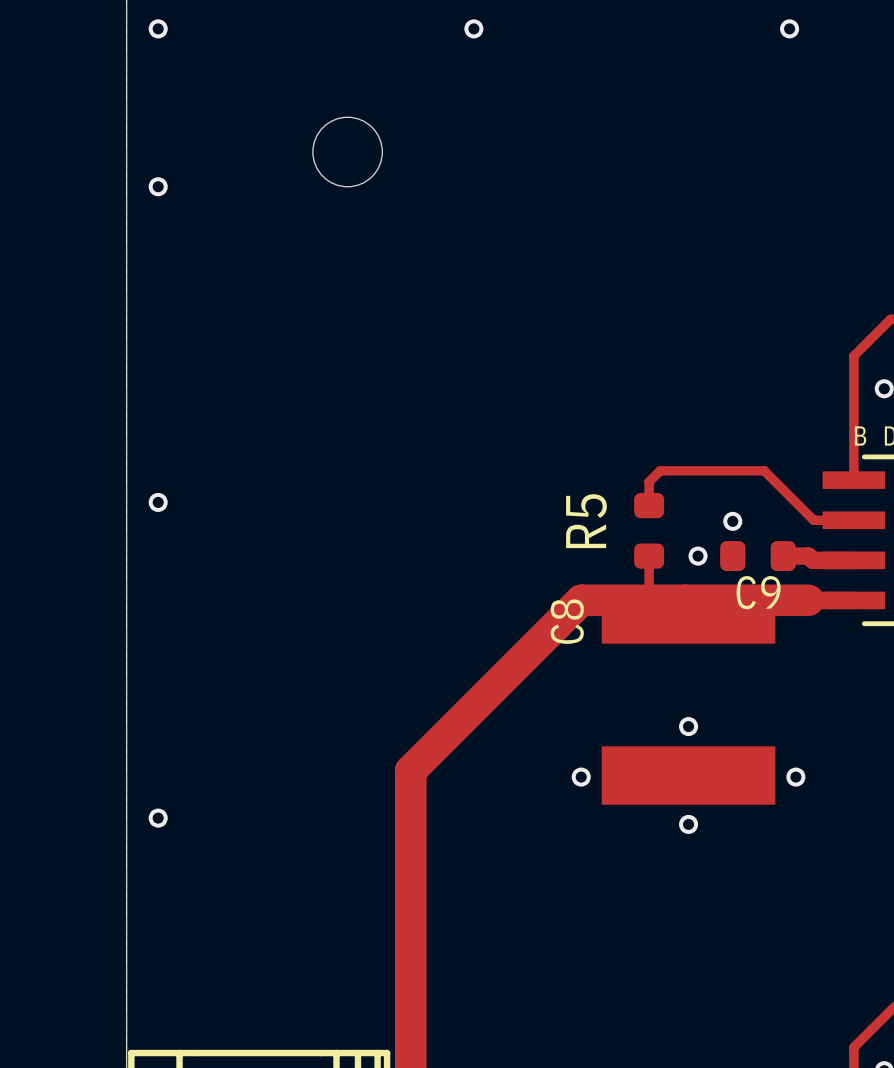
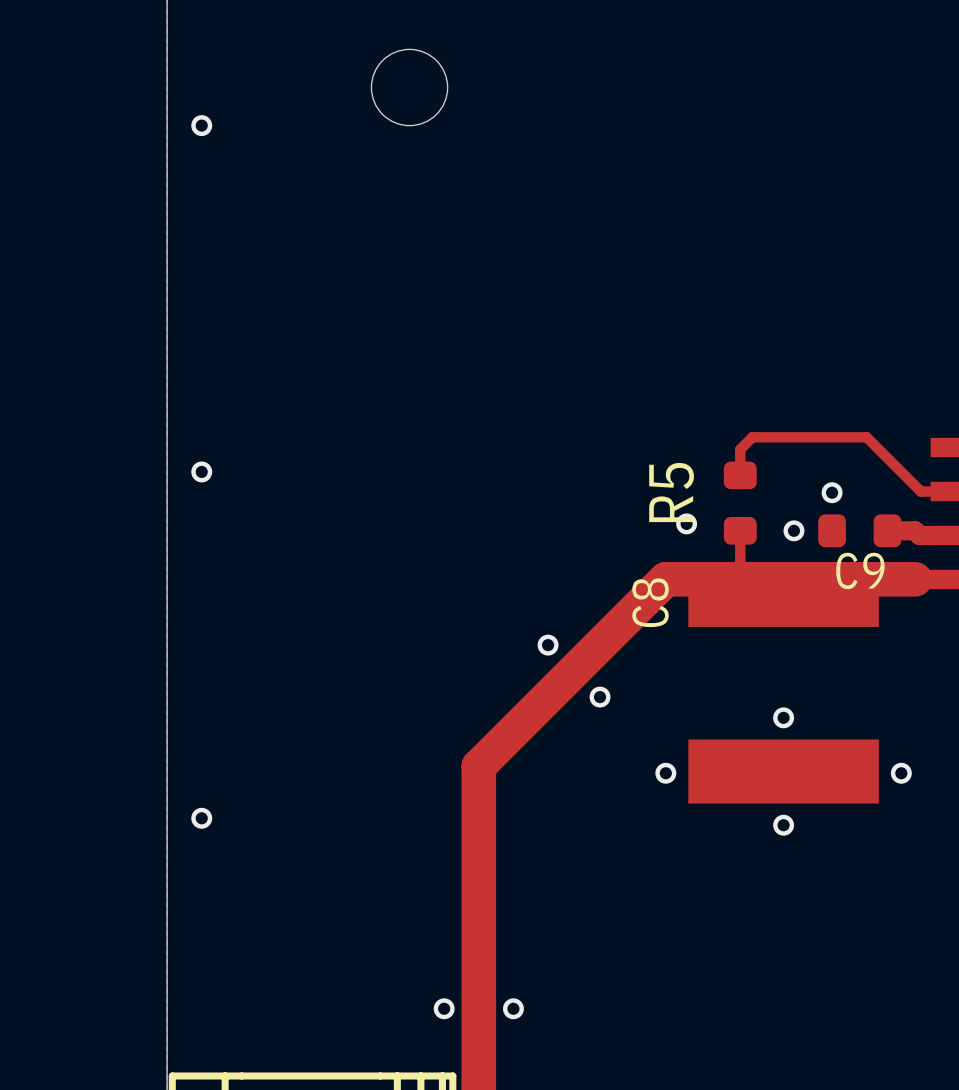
via: none -> (686, 523)
via: none -> (548, 645)
via: none -> (600, 697)
via: none -> (444, 1008)
via: none -> (513, 1008)

